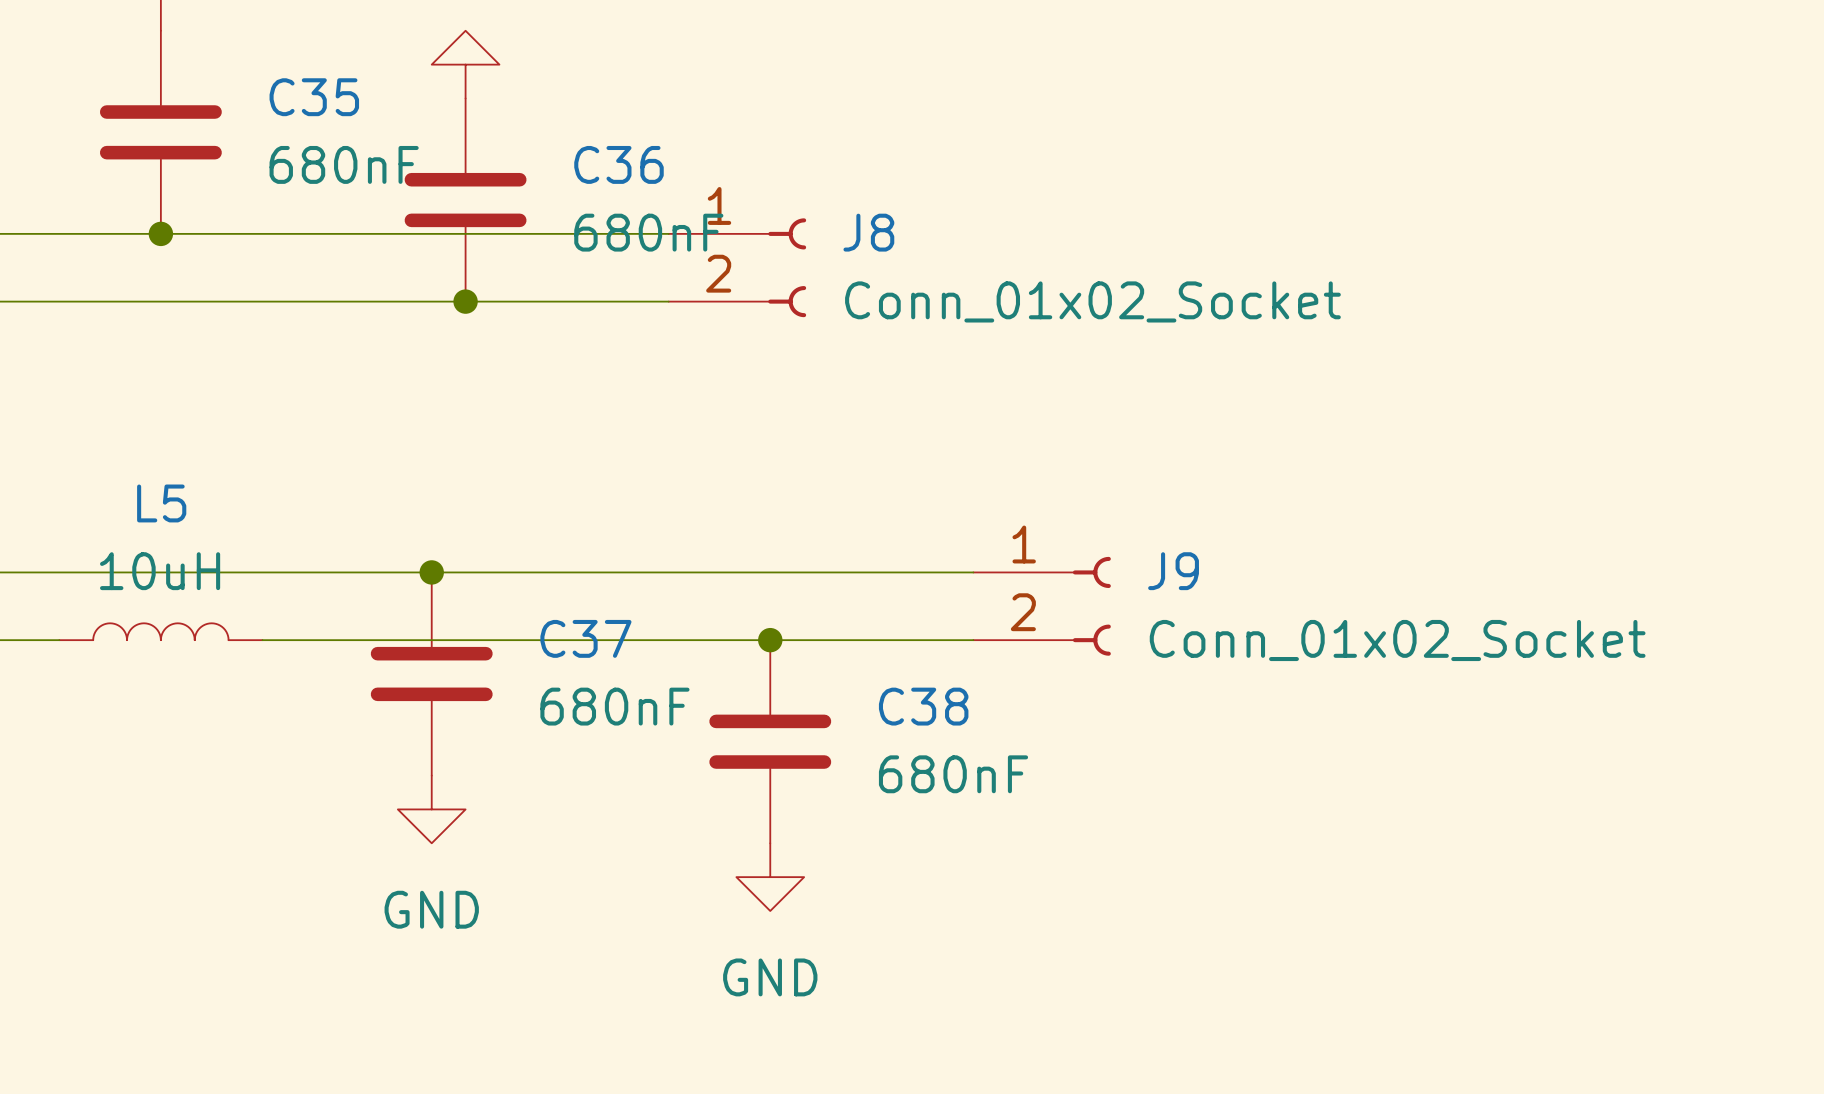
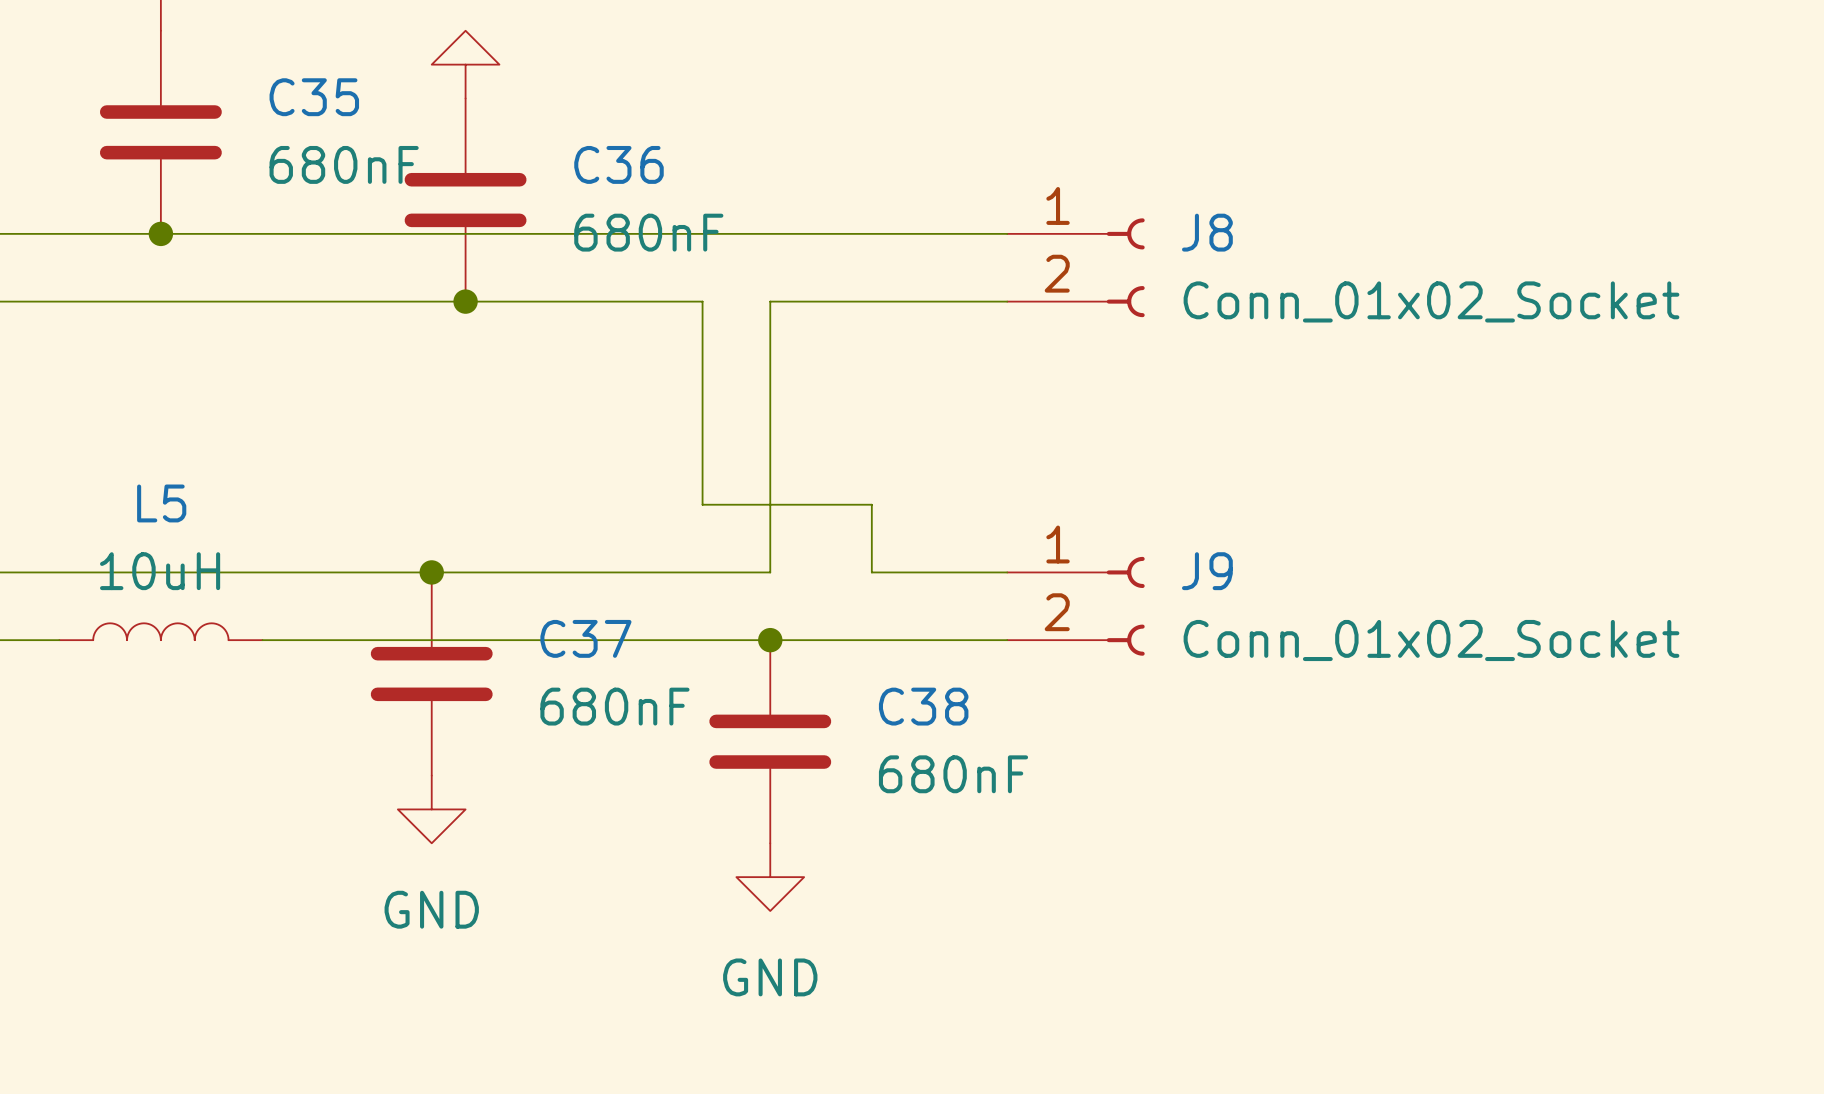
wire: none -> (668, 233) (1007, 233)
J8 position: (737, 267) -> (1075, 267)
wire: none -> (1007, 301) (770, 301) (770, 572)
wire: (770, 572) (871, 572) -> (668, 301) (702, 301) (702, 504) (871, 504) (871, 572)
J9 position: (1042, 606) -> (1075, 606)

